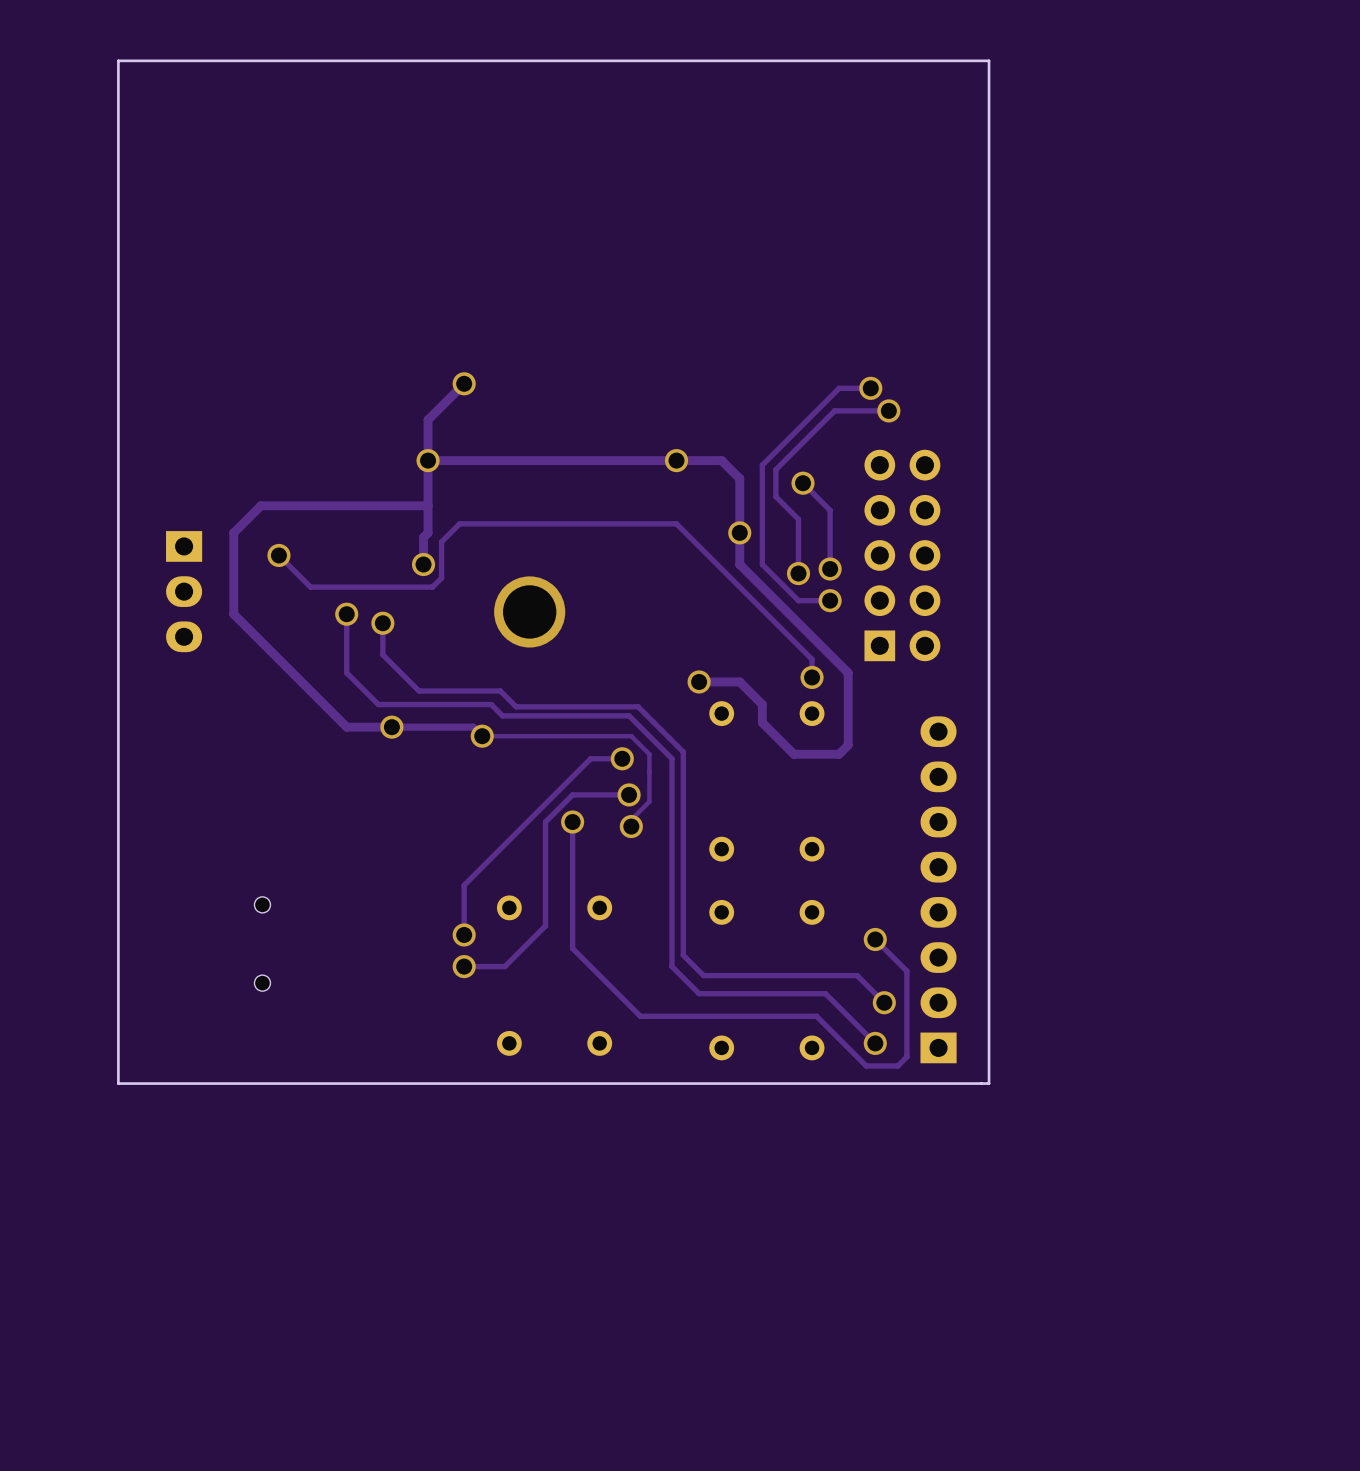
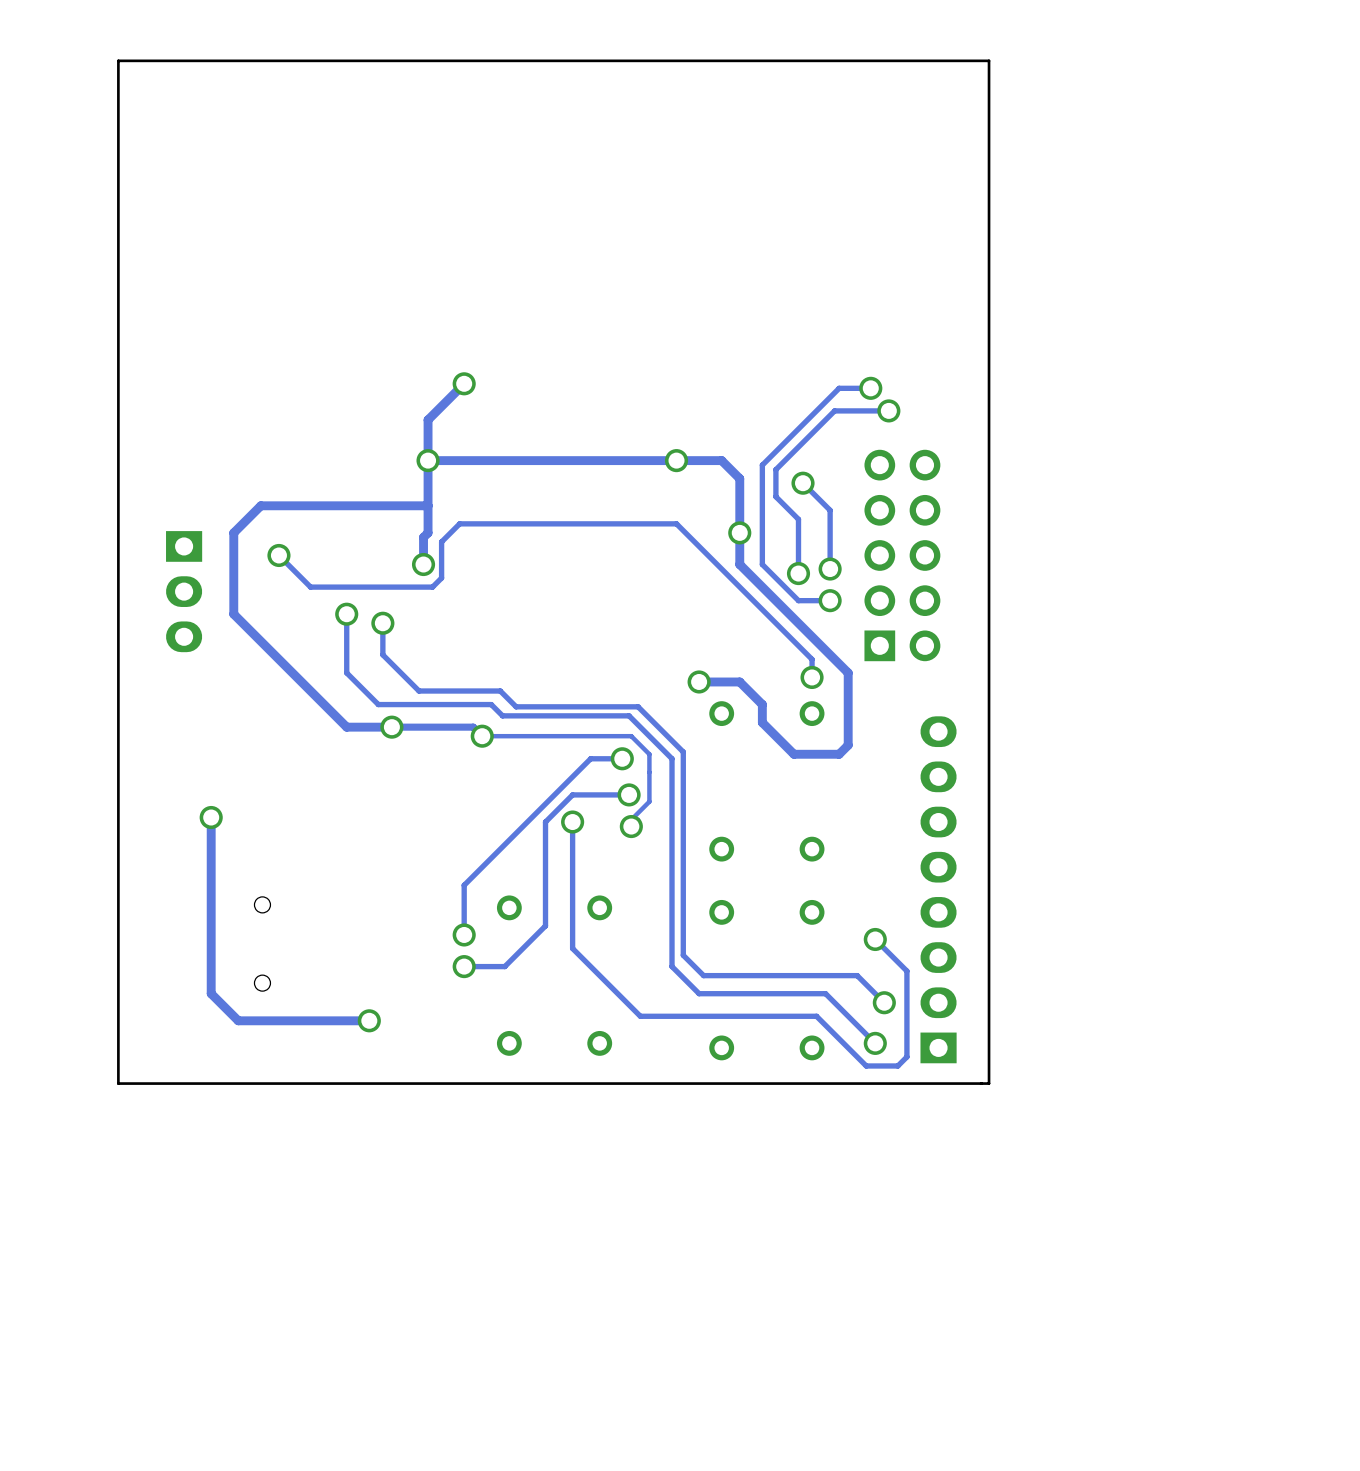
via: (529, 611) -> none
track: none -> (211, 817) (211, 993) (238, 1020) (369, 1020)
via: none -> (211, 817)
via: none -> (369, 1020)

